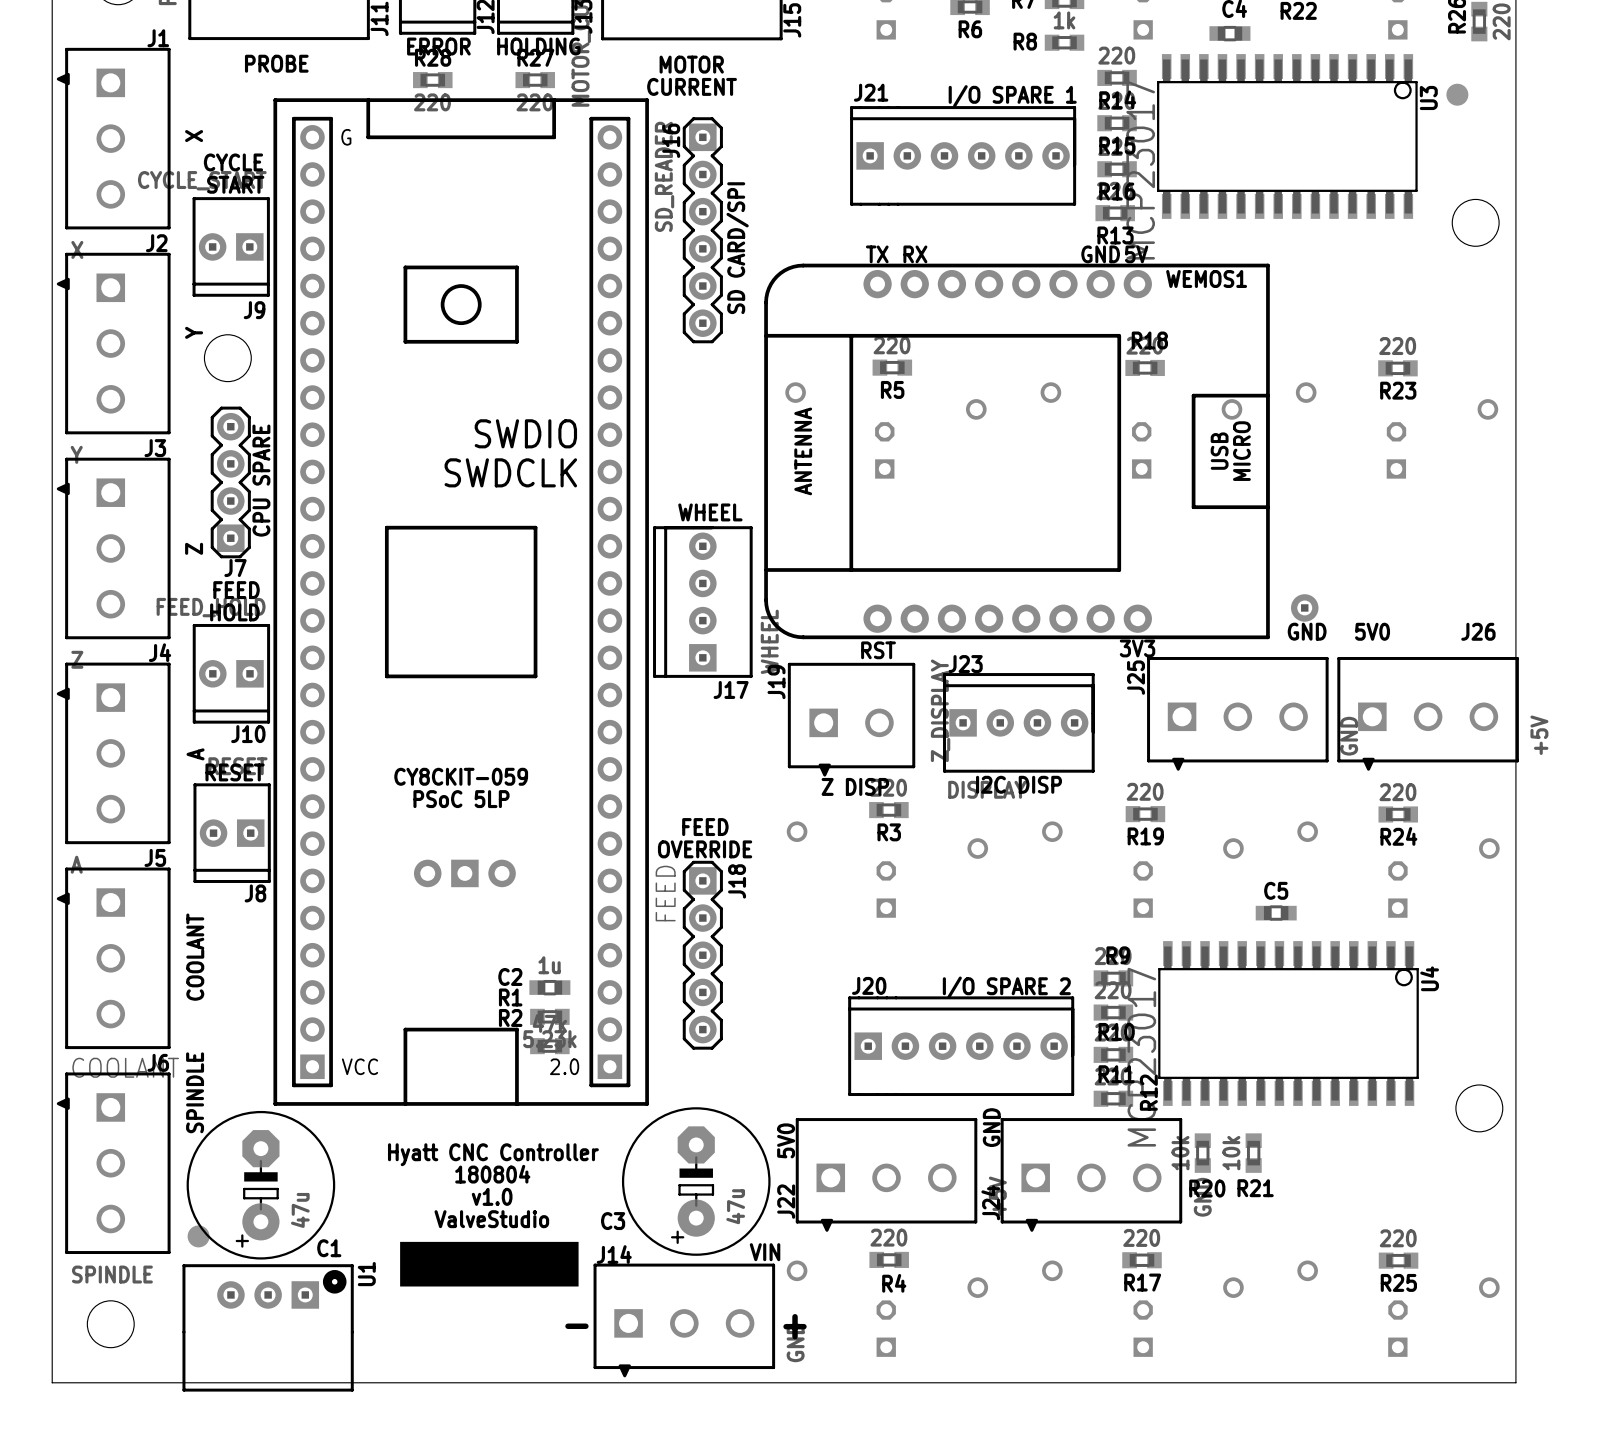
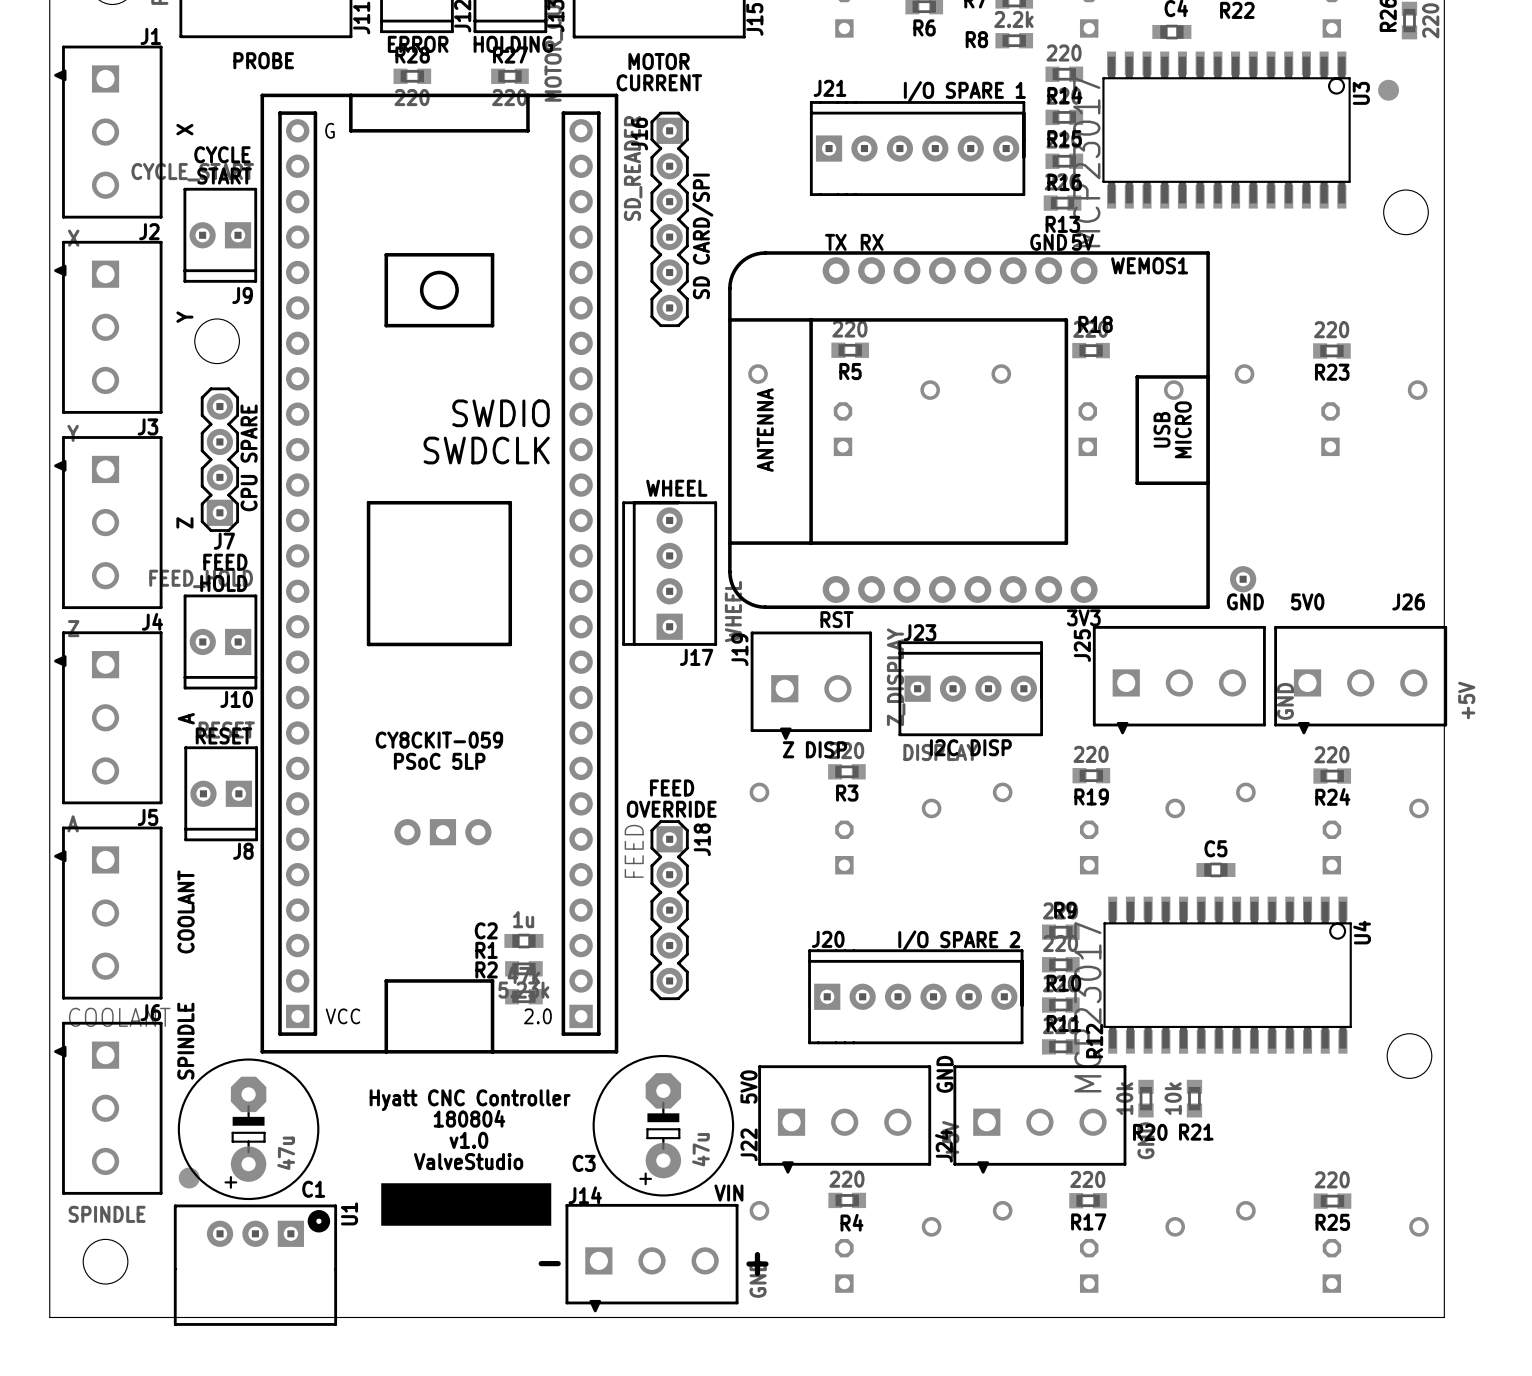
R8 value: 1k (1064, 20) -> 2.2k (1013, 19)

